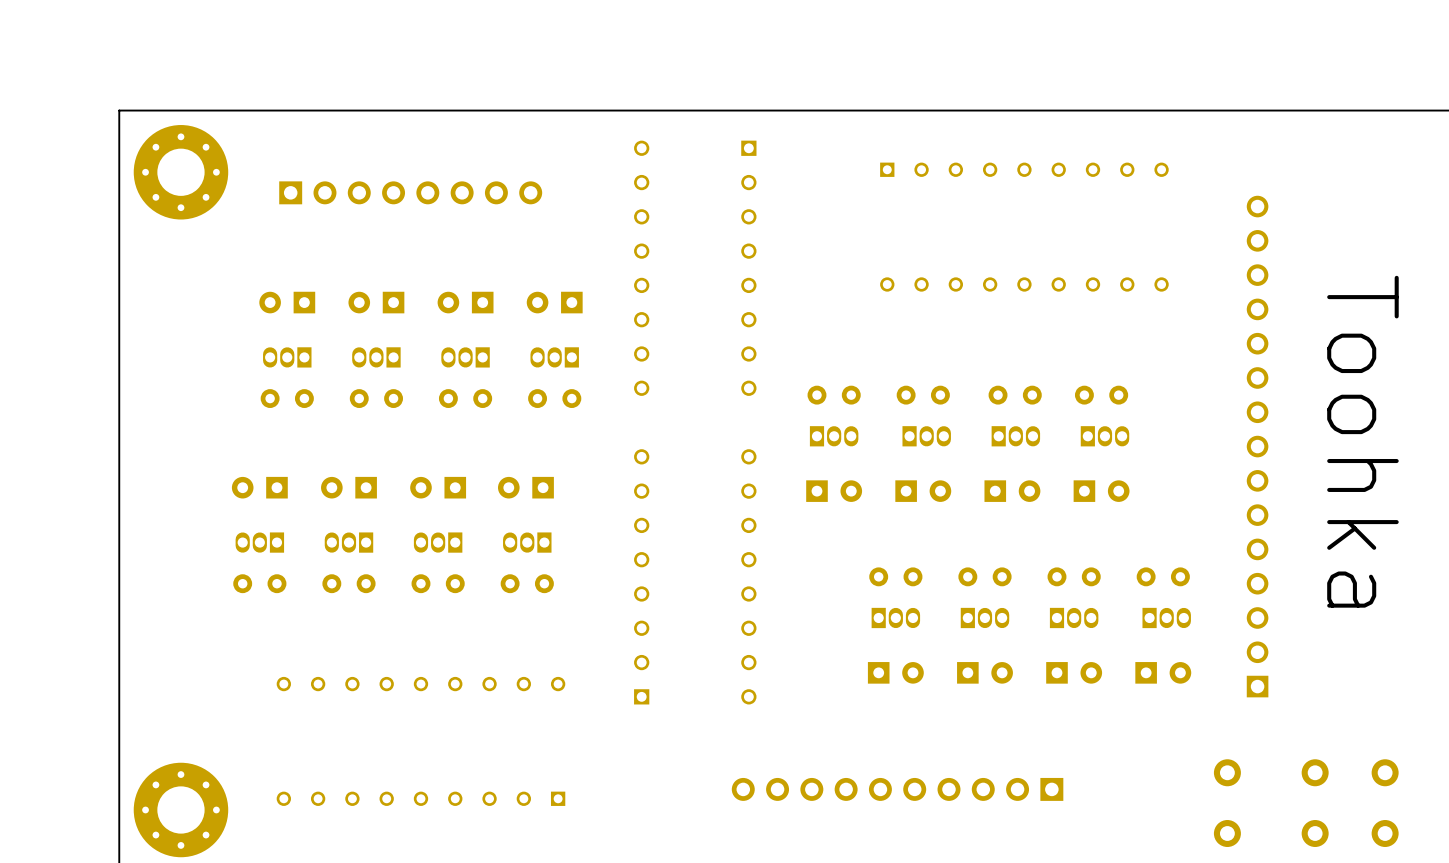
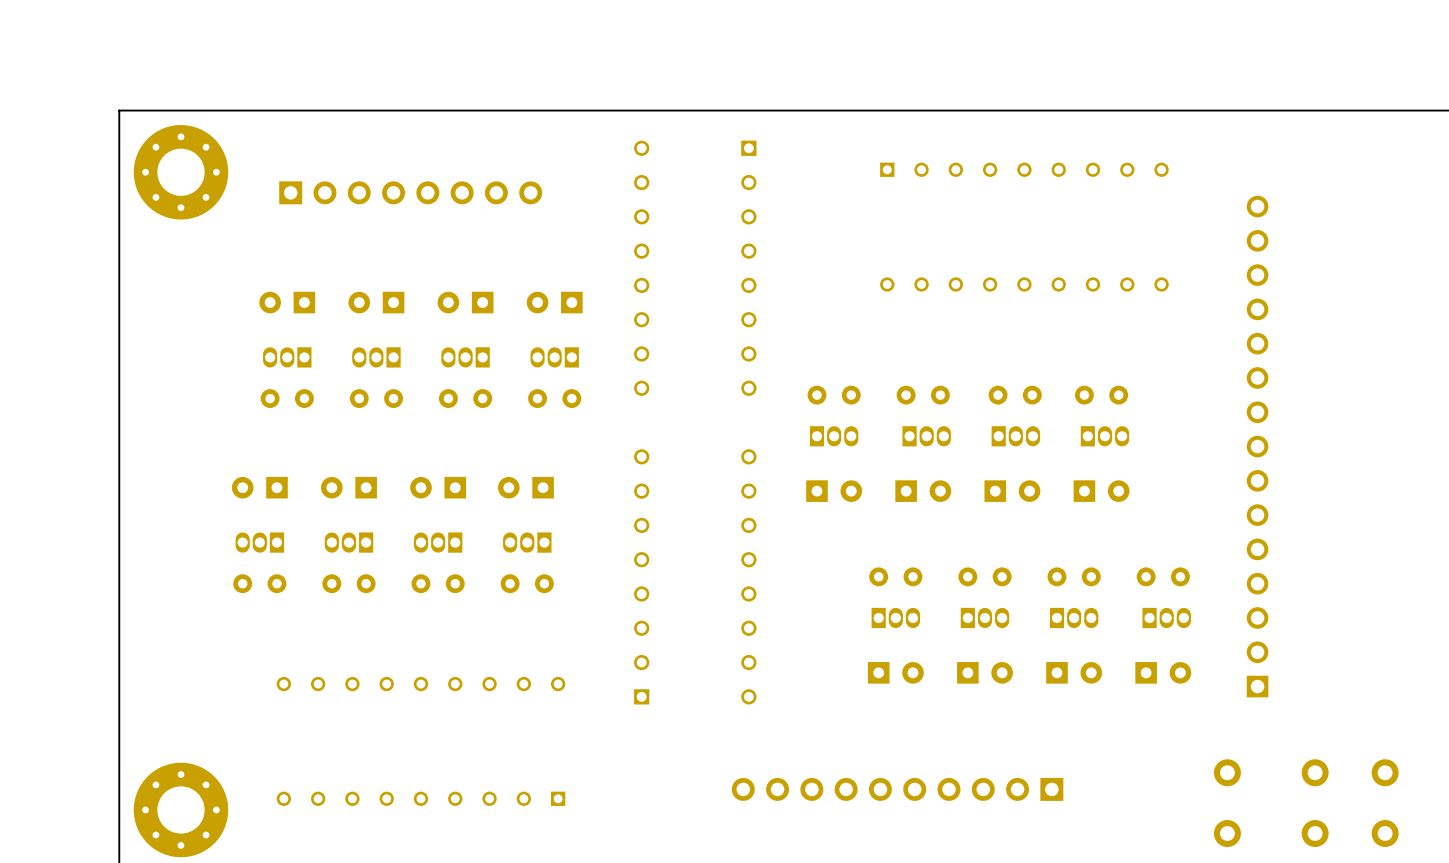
text: Toohka (1362, 441) -> none

